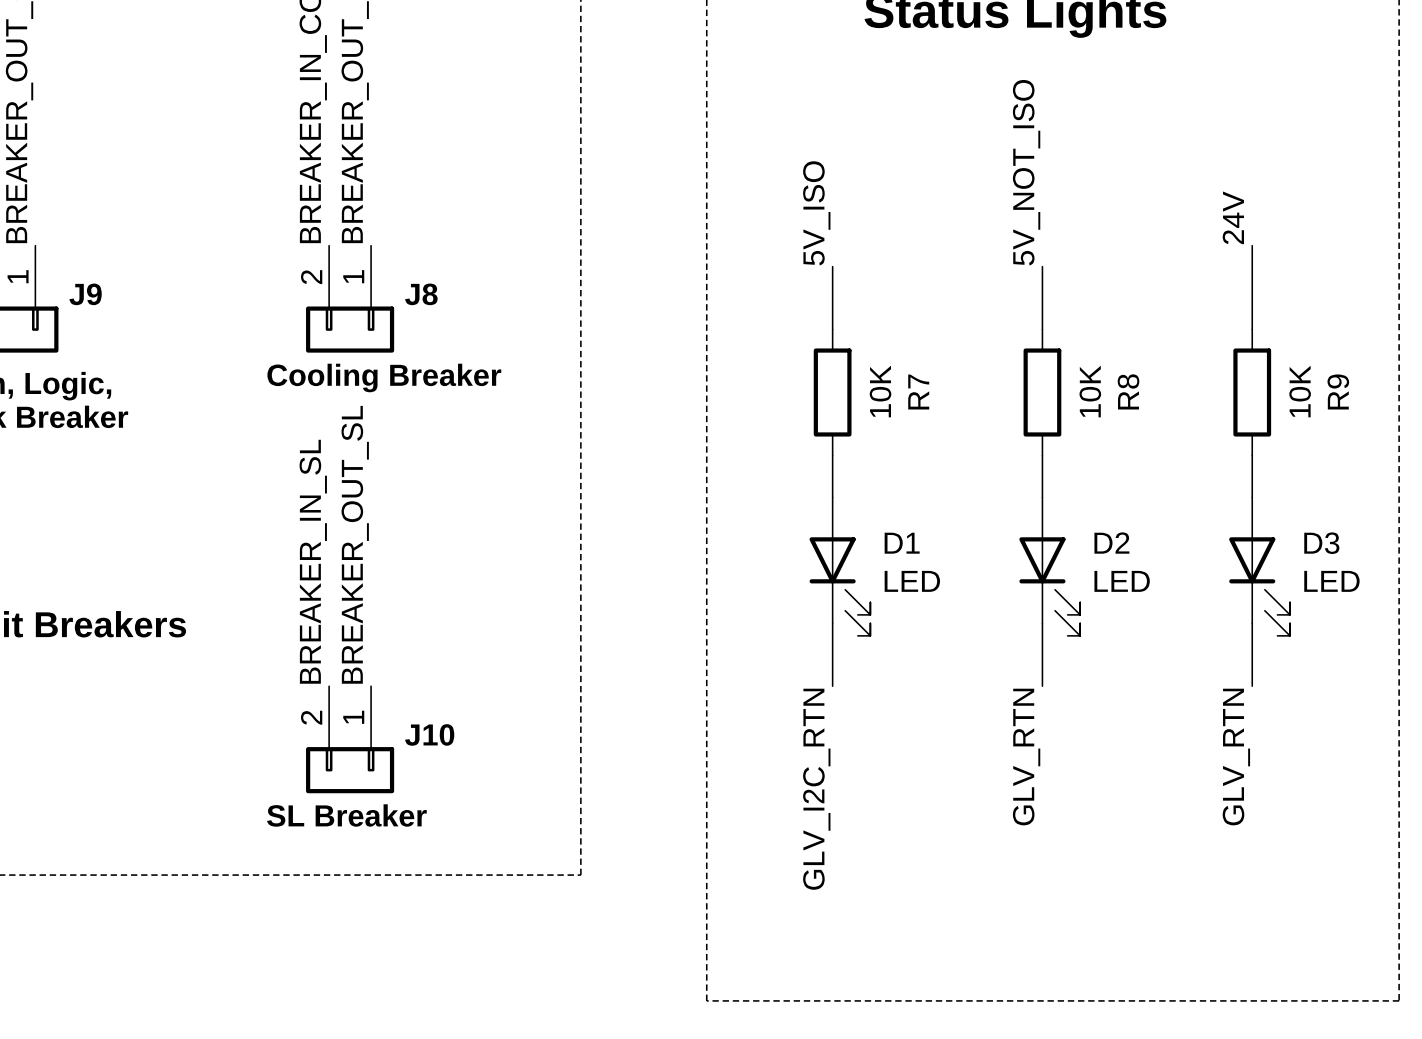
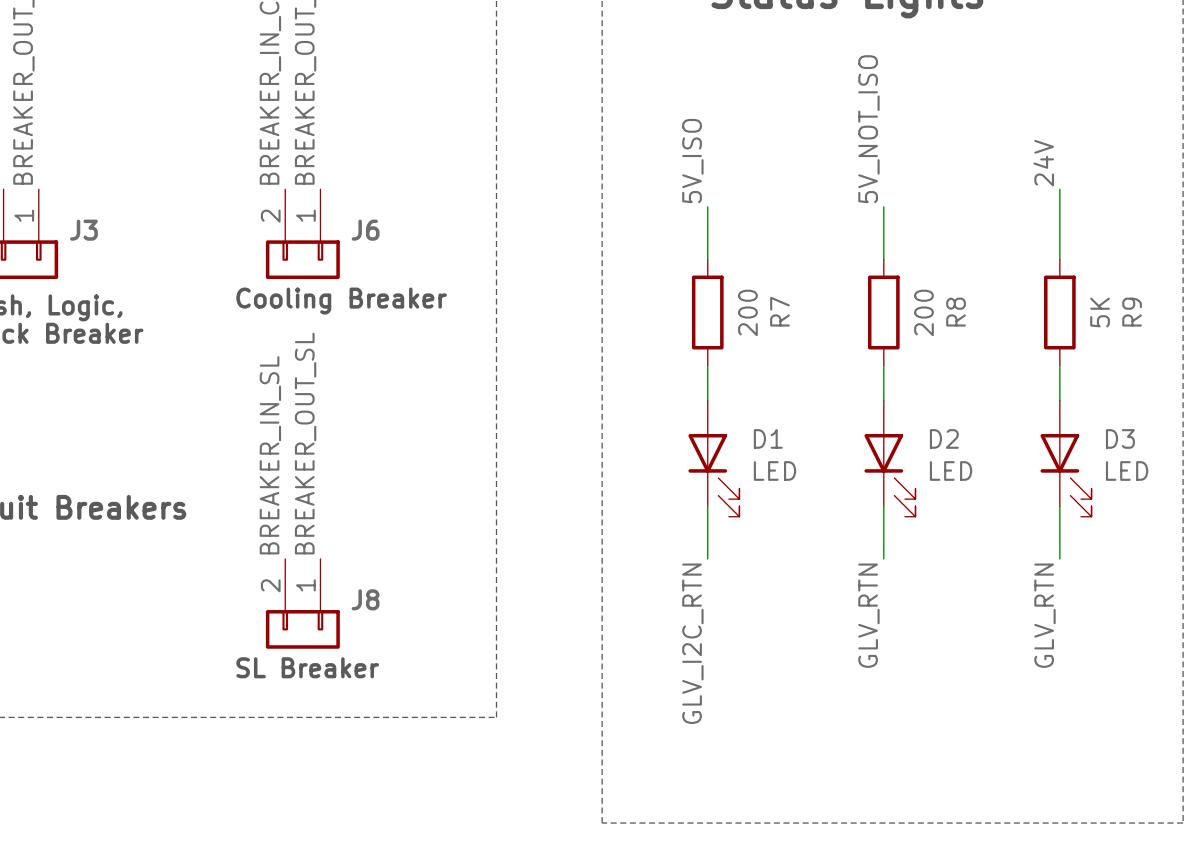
J9 name: J9 (85, 294) -> J3 (83, 230)
J8 name: J8 (421, 294) -> J6 (365, 230)
R7 value: 10K (880, 391) -> 200 (747, 312)
R8 value: 10K (1090, 391) -> 200 (923, 312)
R9 value: 10K (1300, 391) -> 5K (1100, 312)
J10 name: J10 (429, 734) -> J8 (365, 599)

